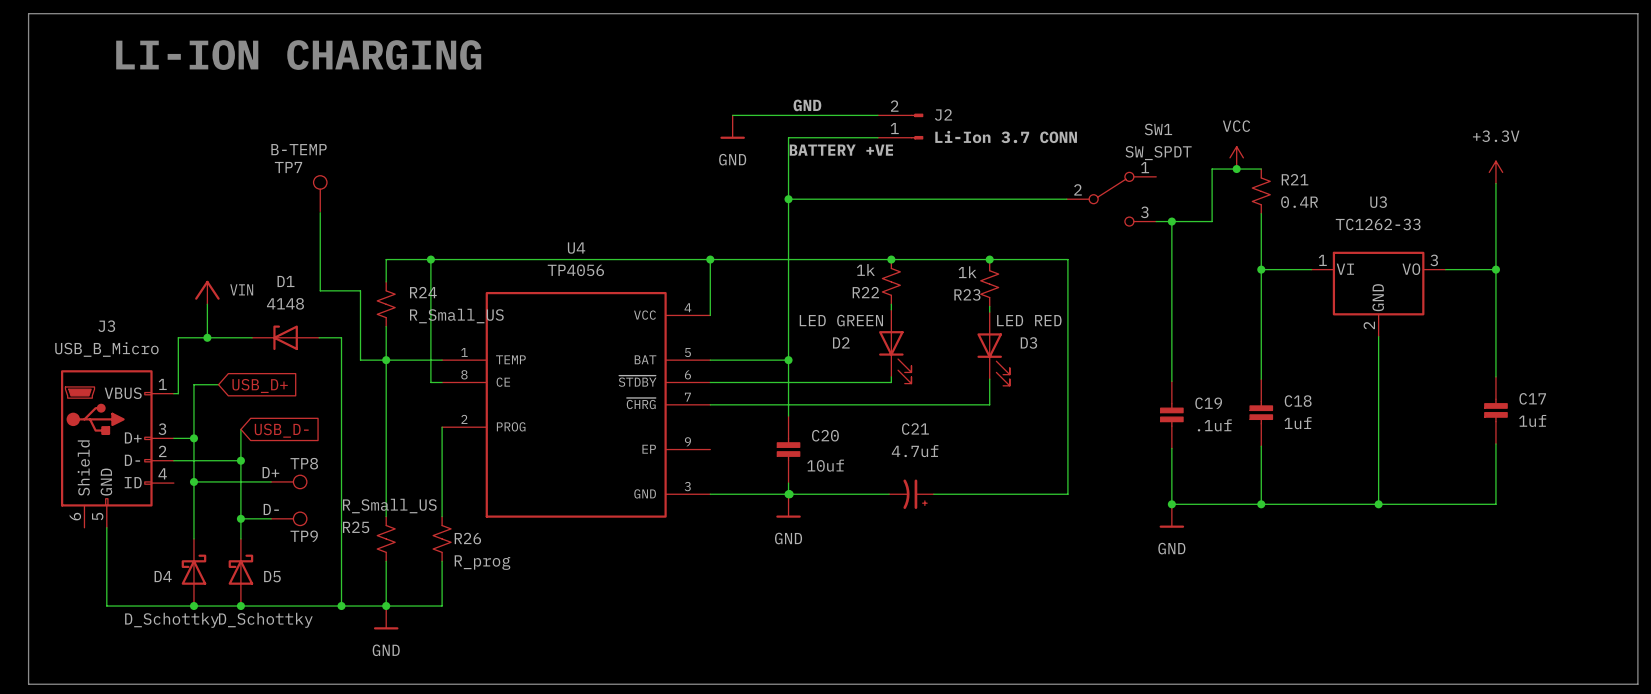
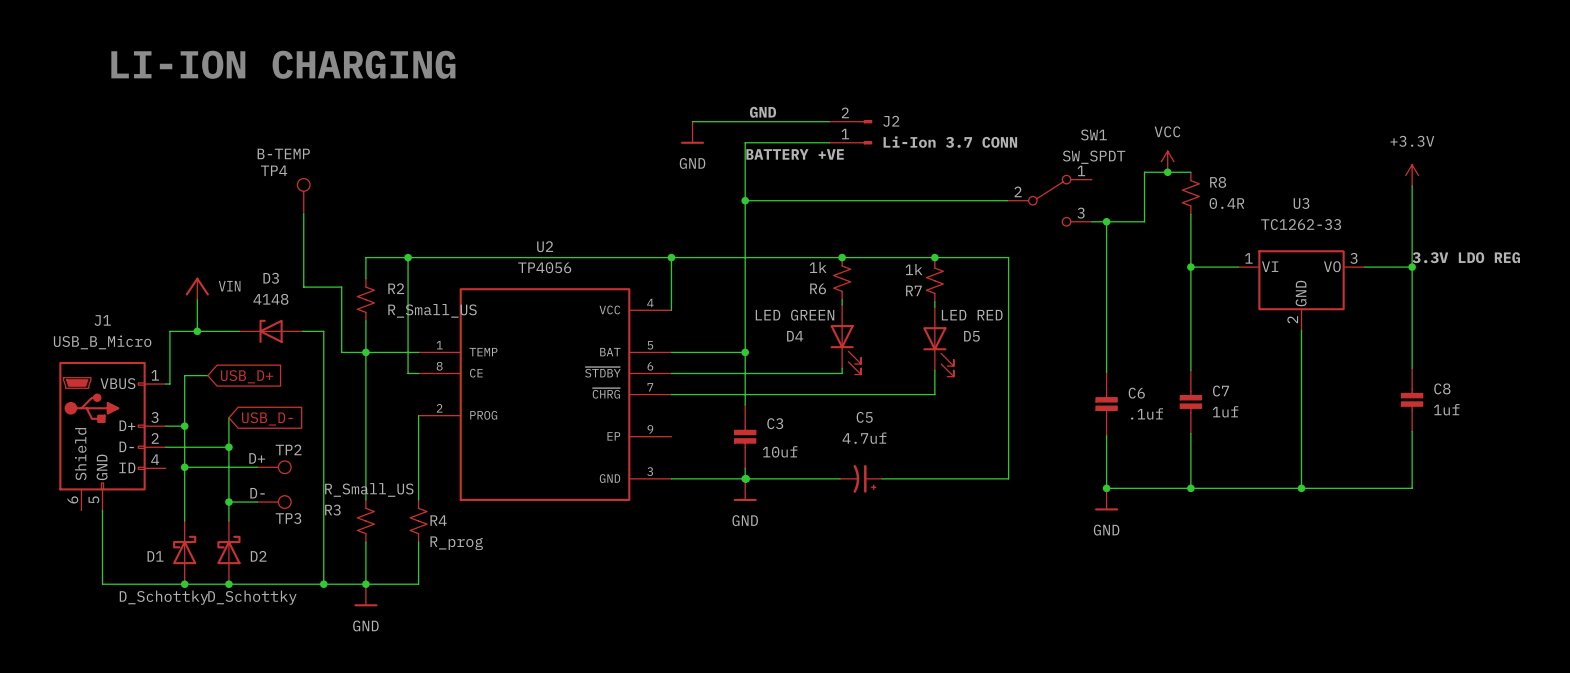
line: (28, 13) (28, 684) (1637, 684) (1637, 13) (28, 13) -> none
TP7 name: TP7 (288, 167) -> TP4 (274, 170)
R21 name: R21 (1295, 179) -> R8 (1218, 182)
U4 name: U4 (576, 248) -> U2 (545, 246)
label: none -> 3.3V LDO REG (1466, 257)
D1 name: D1 (286, 281) -> D3 (271, 278)
R24 name: R24 (423, 292) -> R2 (396, 288)
R22 name: R22 (865, 292) -> R6 (818, 288)
R23 name: R23 (967, 294) -> R7 (913, 290)
J3 name: J3 (106, 326) -> J1 (102, 320)
D2 name: D2 (841, 342) -> D4 (795, 336)
D3 name: D3 (1028, 342) -> D5 (971, 336)
C17 name: C17 (1532, 398) -> C8 (1442, 388)
C18 name: C18 (1298, 401) -> C7 (1221, 391)
C19 name: C19 (1208, 403) -> C6 (1136, 393)
C21 name: C21 (915, 429) -> C5 (864, 417)
C20 name: C20 (825, 435) -> C3 (775, 423)
TP8 name: TP8 (304, 463) -> TP2 (288, 449)
R25 name: R25 (356, 527) -> R3 (332, 510)
TP9 name: TP9 (304, 536) -> TP3 (288, 518)
R26 name: R26 (467, 538) -> R4 (438, 520)
D4 name: D4 (163, 576) -> D1 (155, 556)
D5 name: D5 (272, 576) -> D2 (258, 556)

